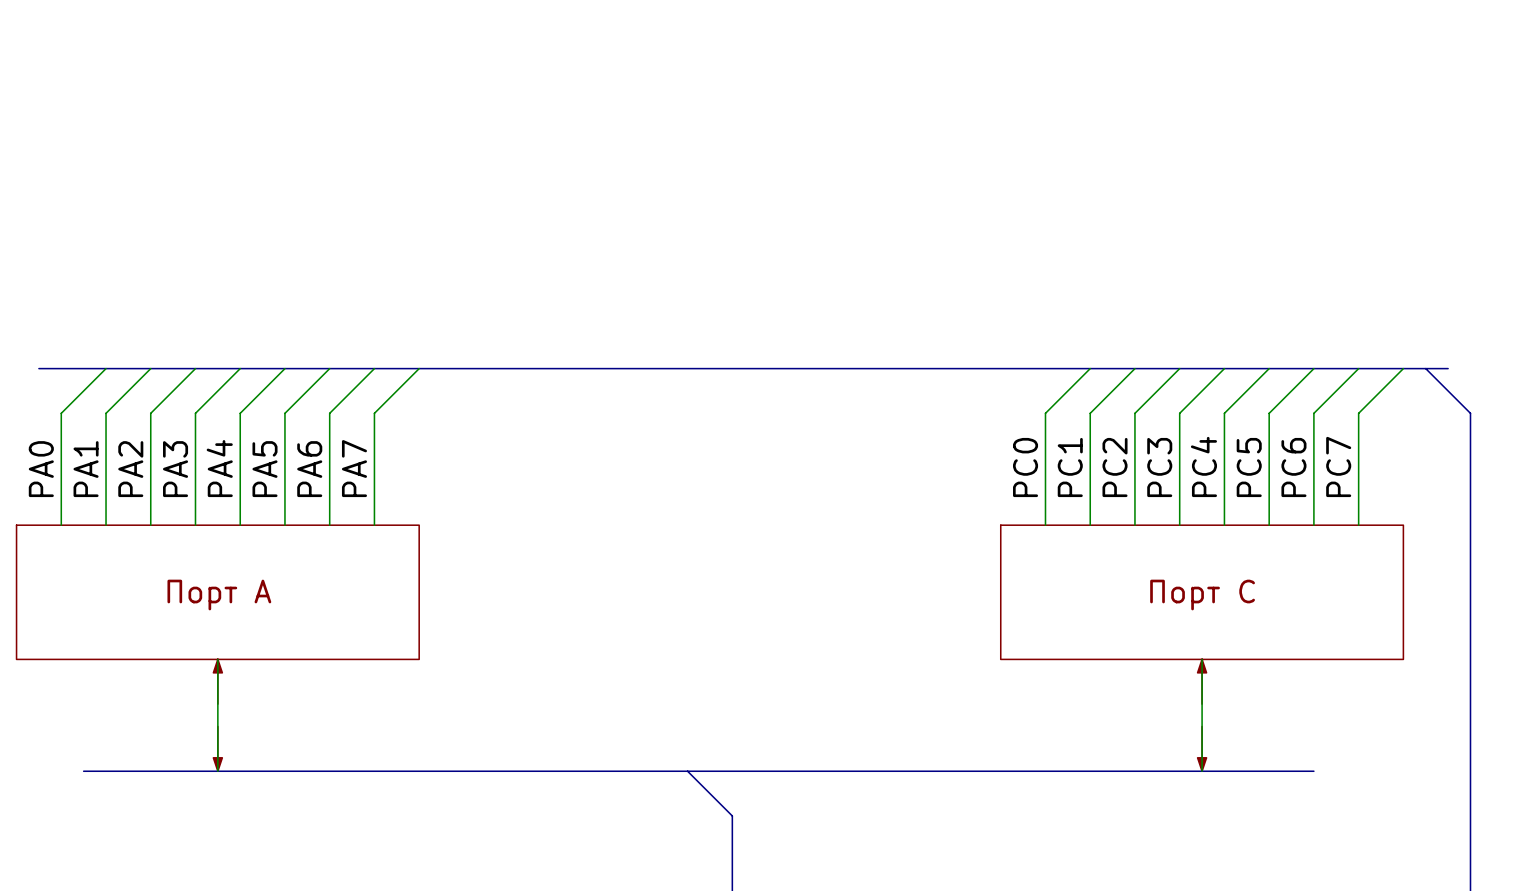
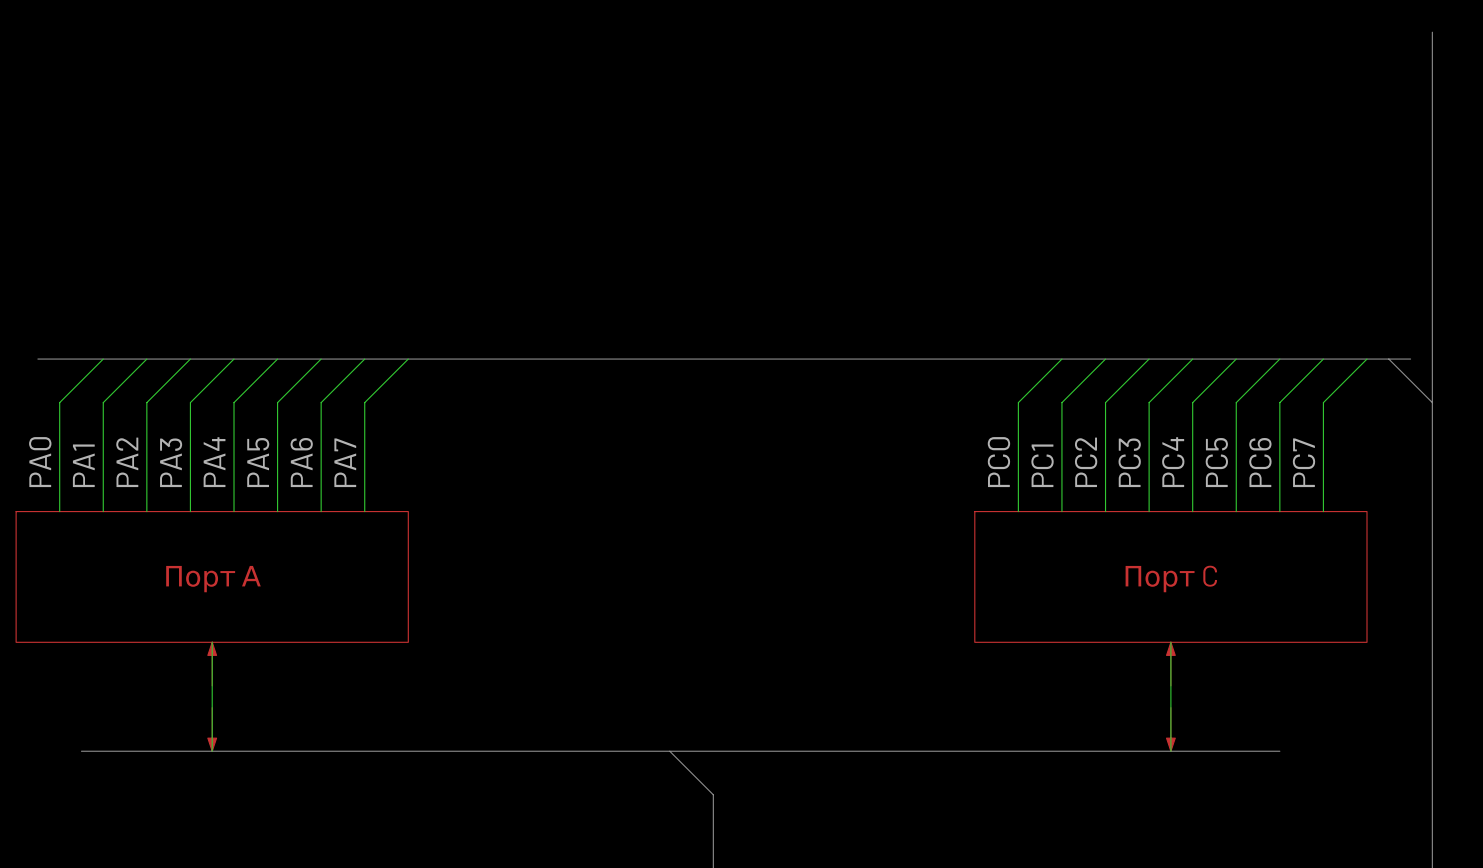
bus: none -> (1432, 32) (1432, 402)

